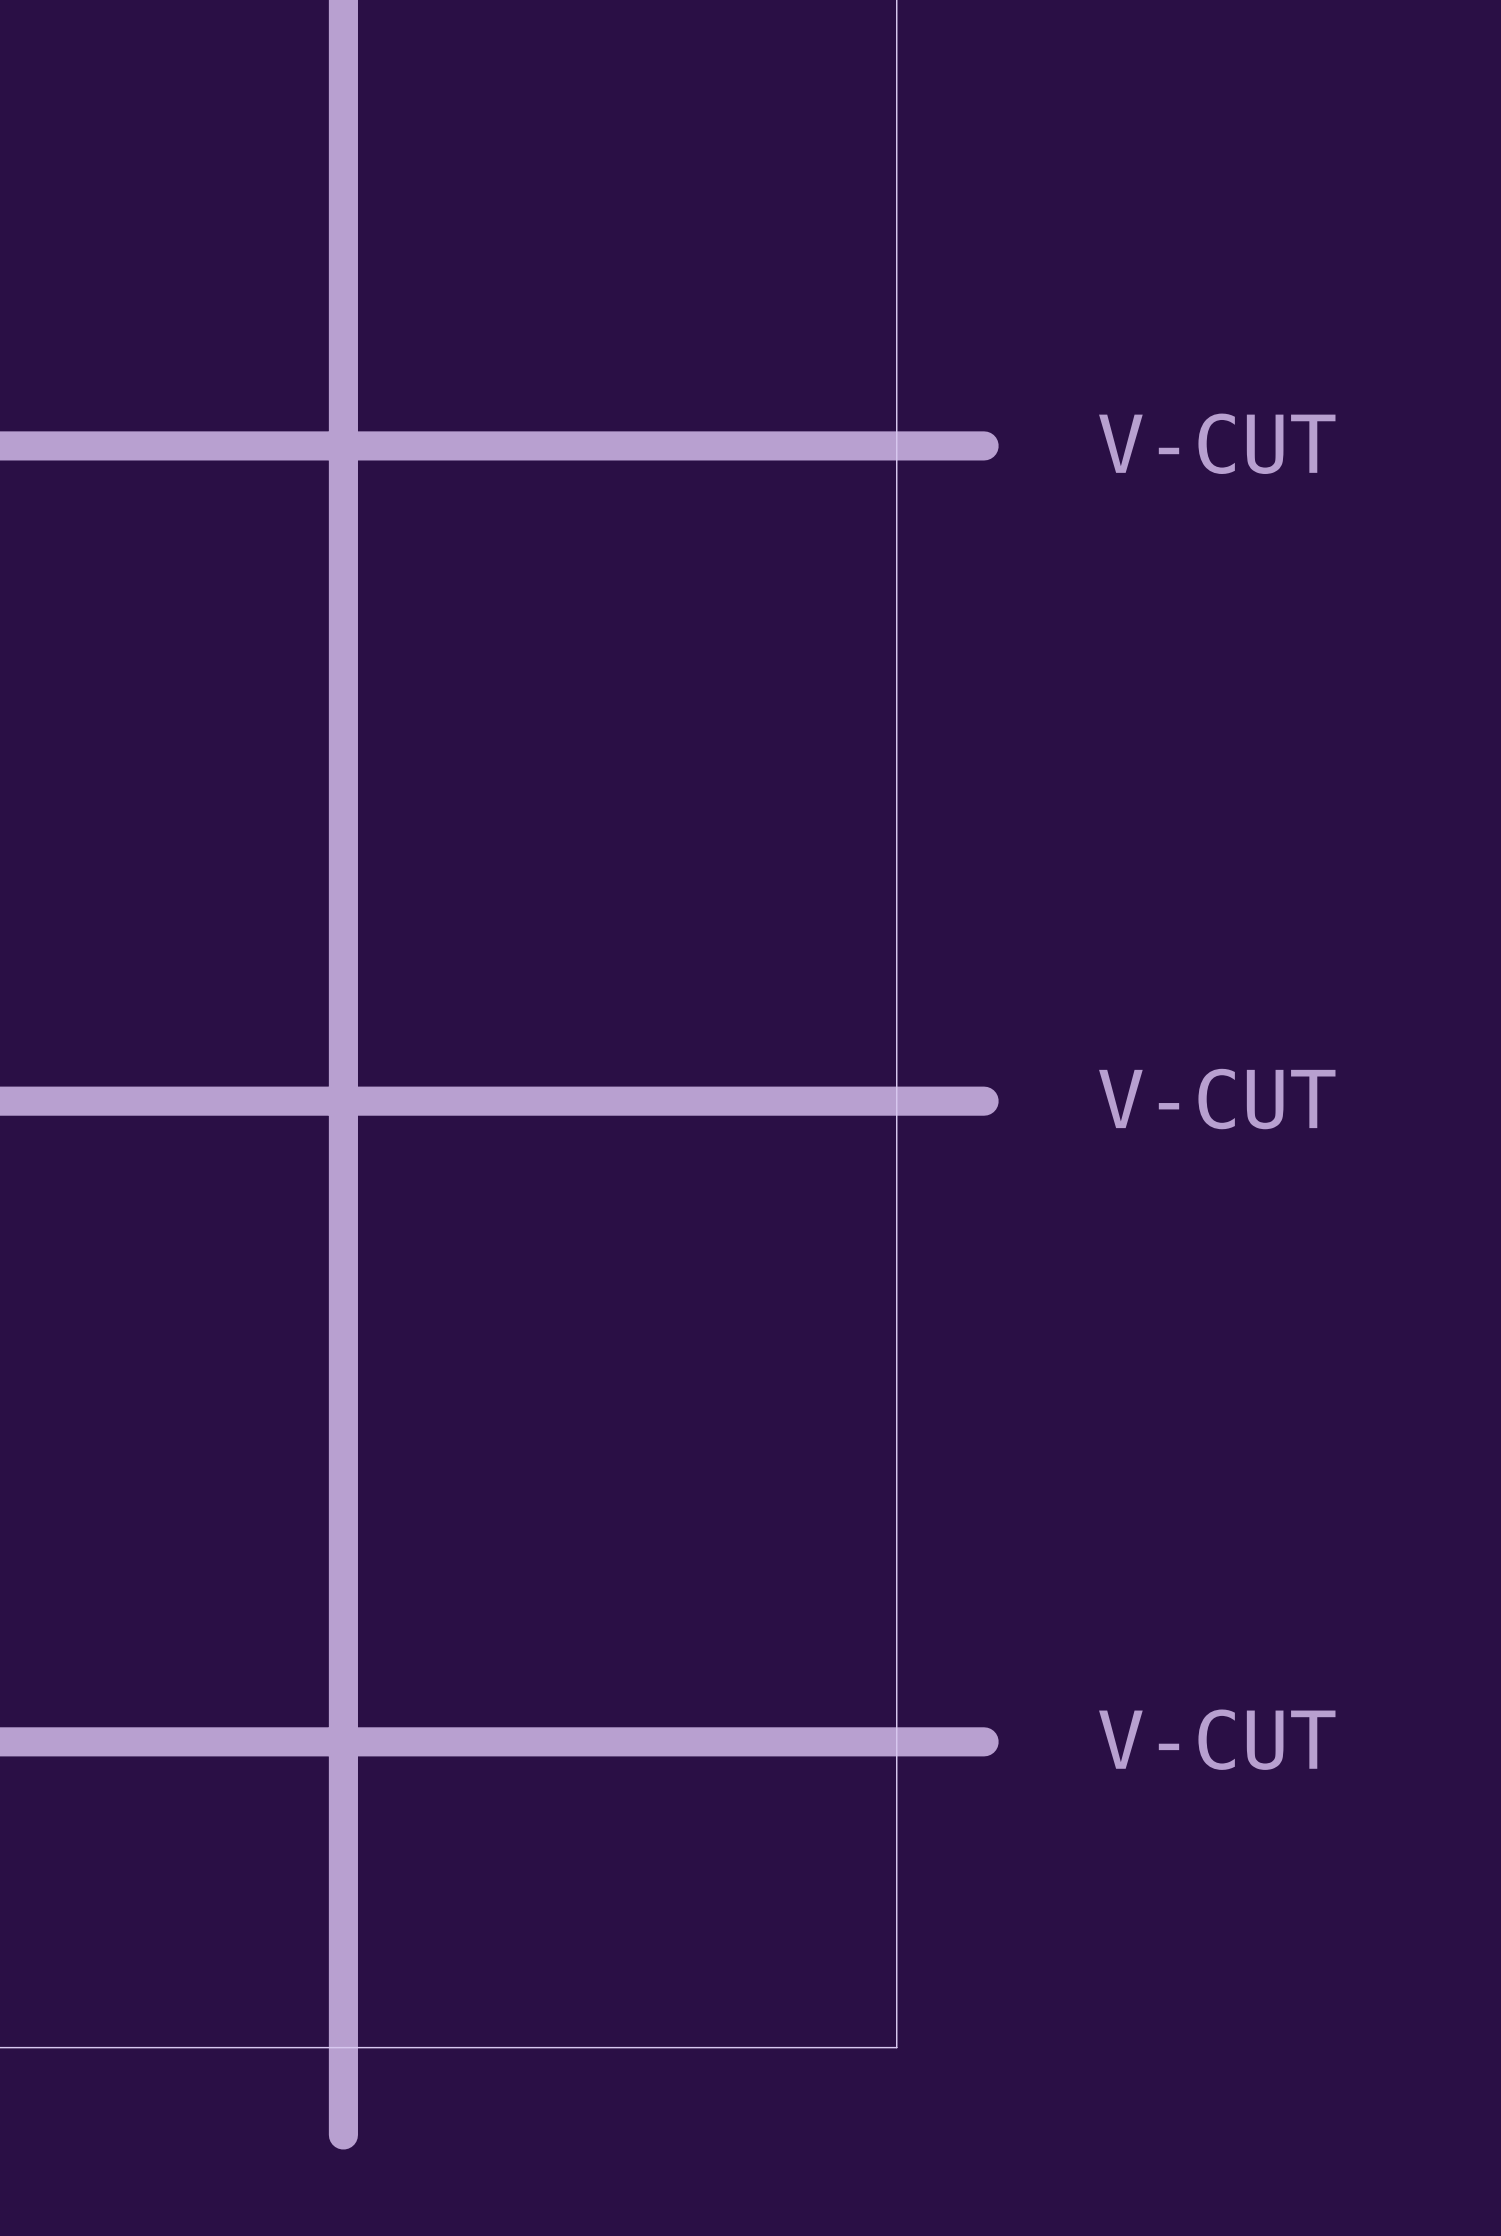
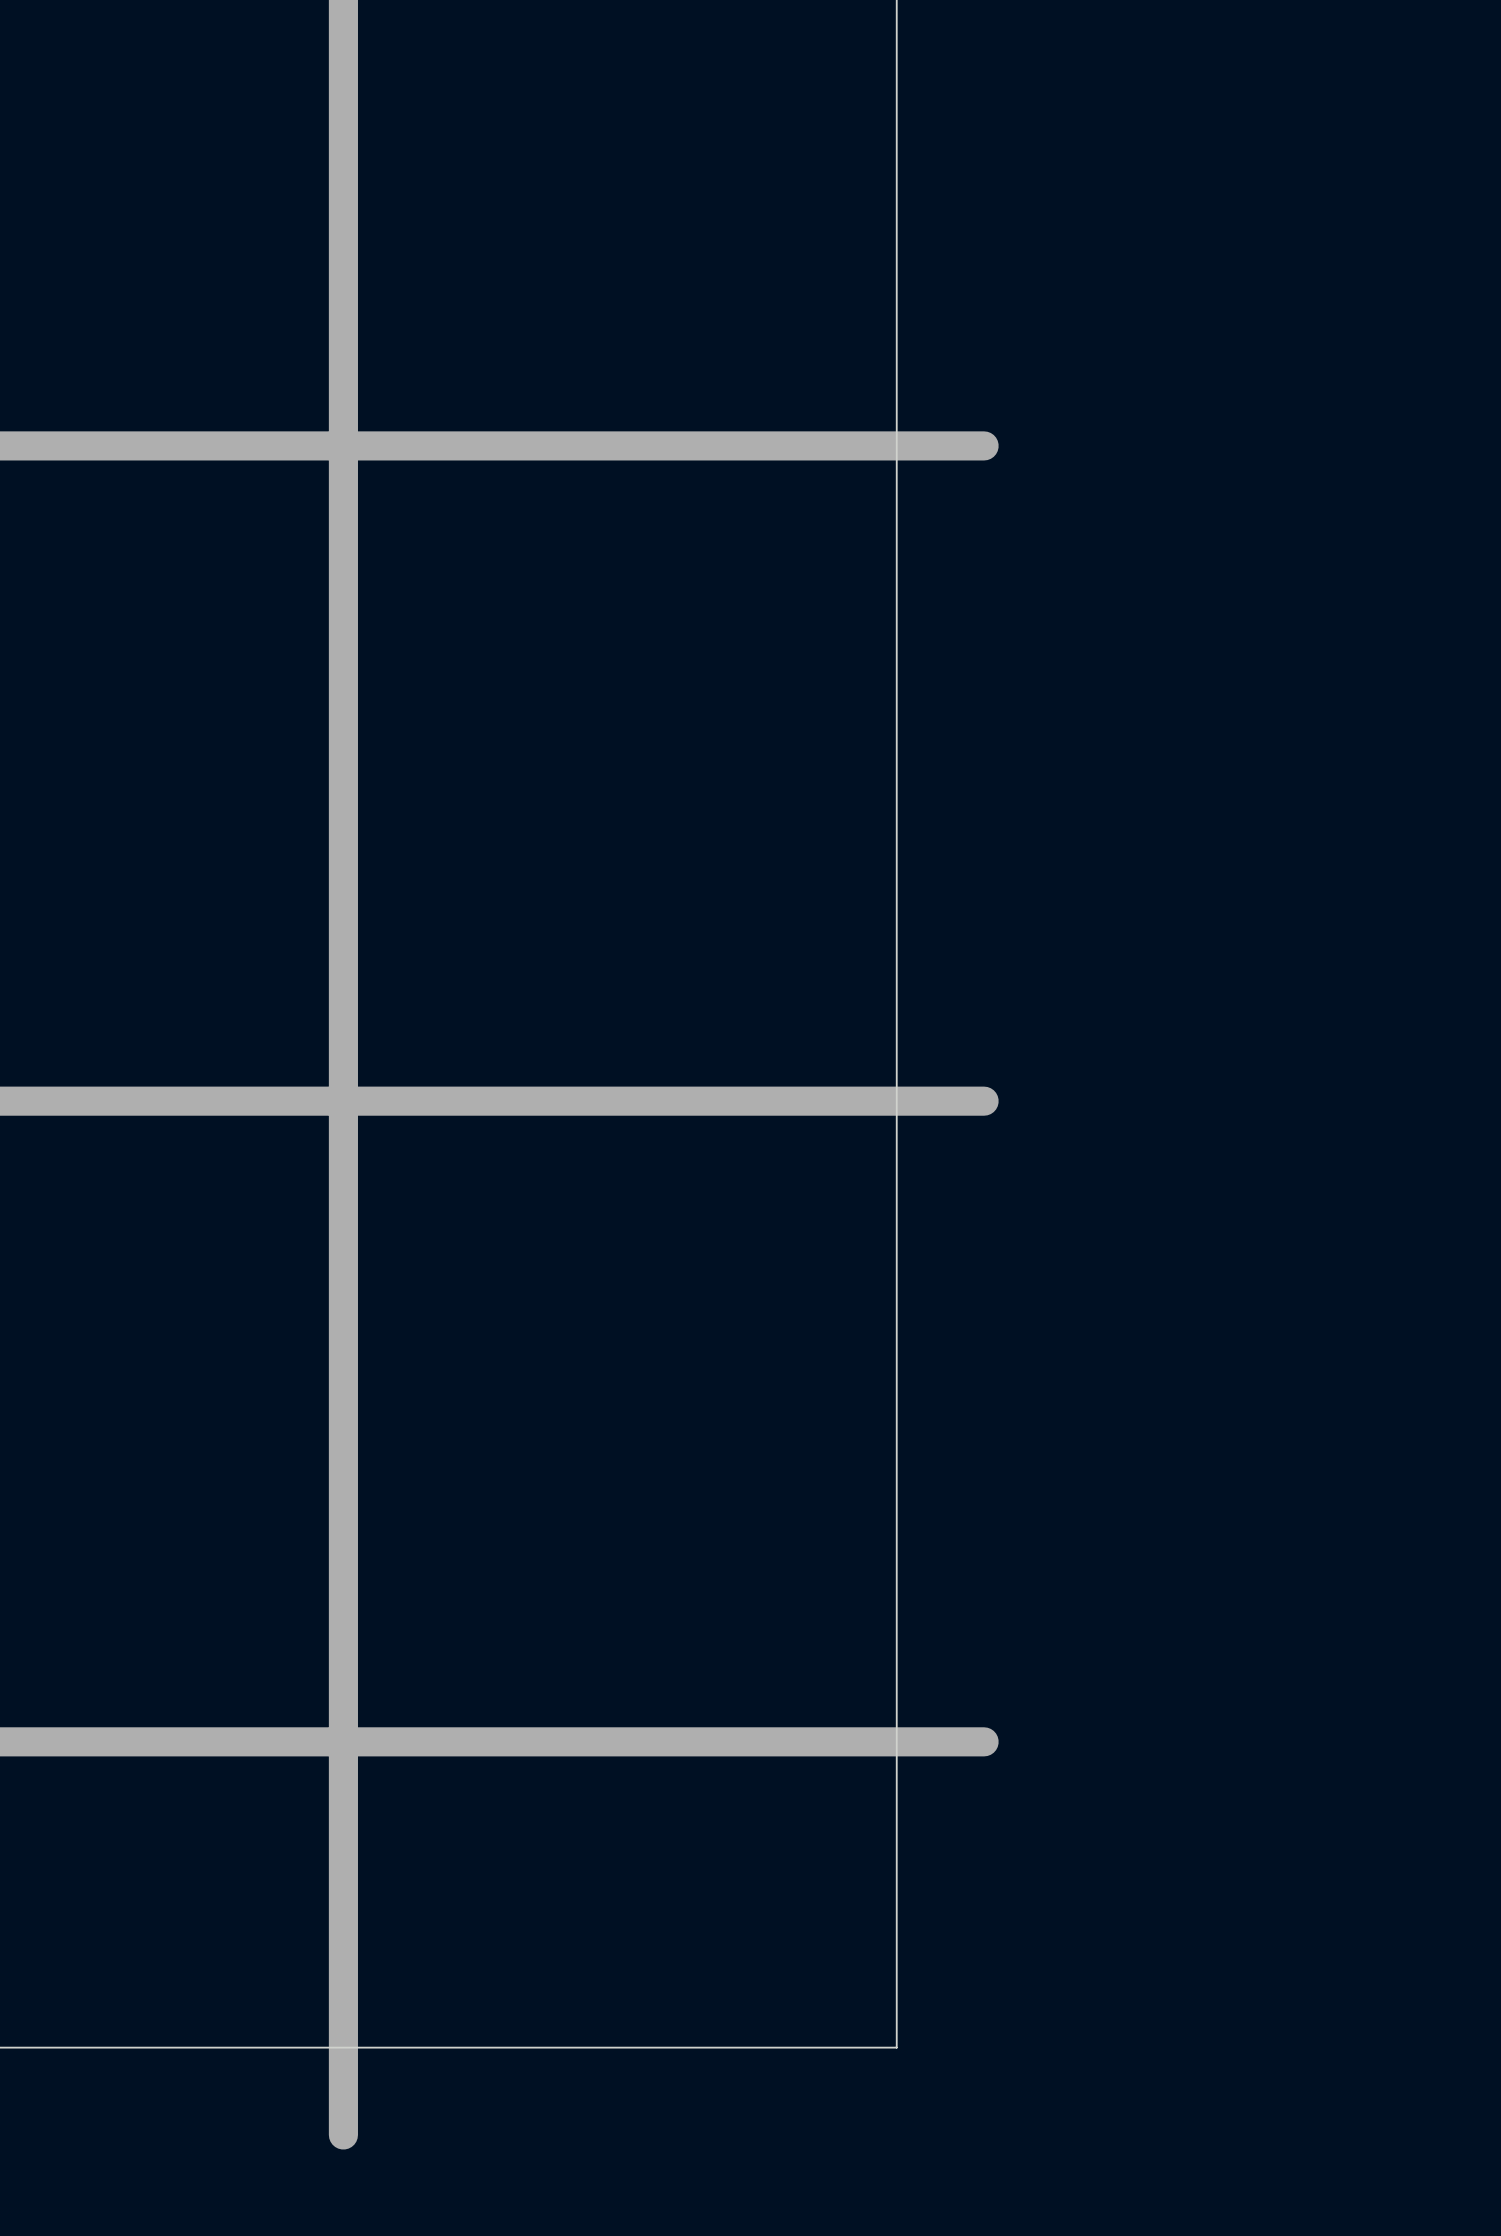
text: V-CUT (1217, 443) -> none
text: V-CUT (1217, 1099) -> none
text: V-CUT (1217, 1739) -> none

